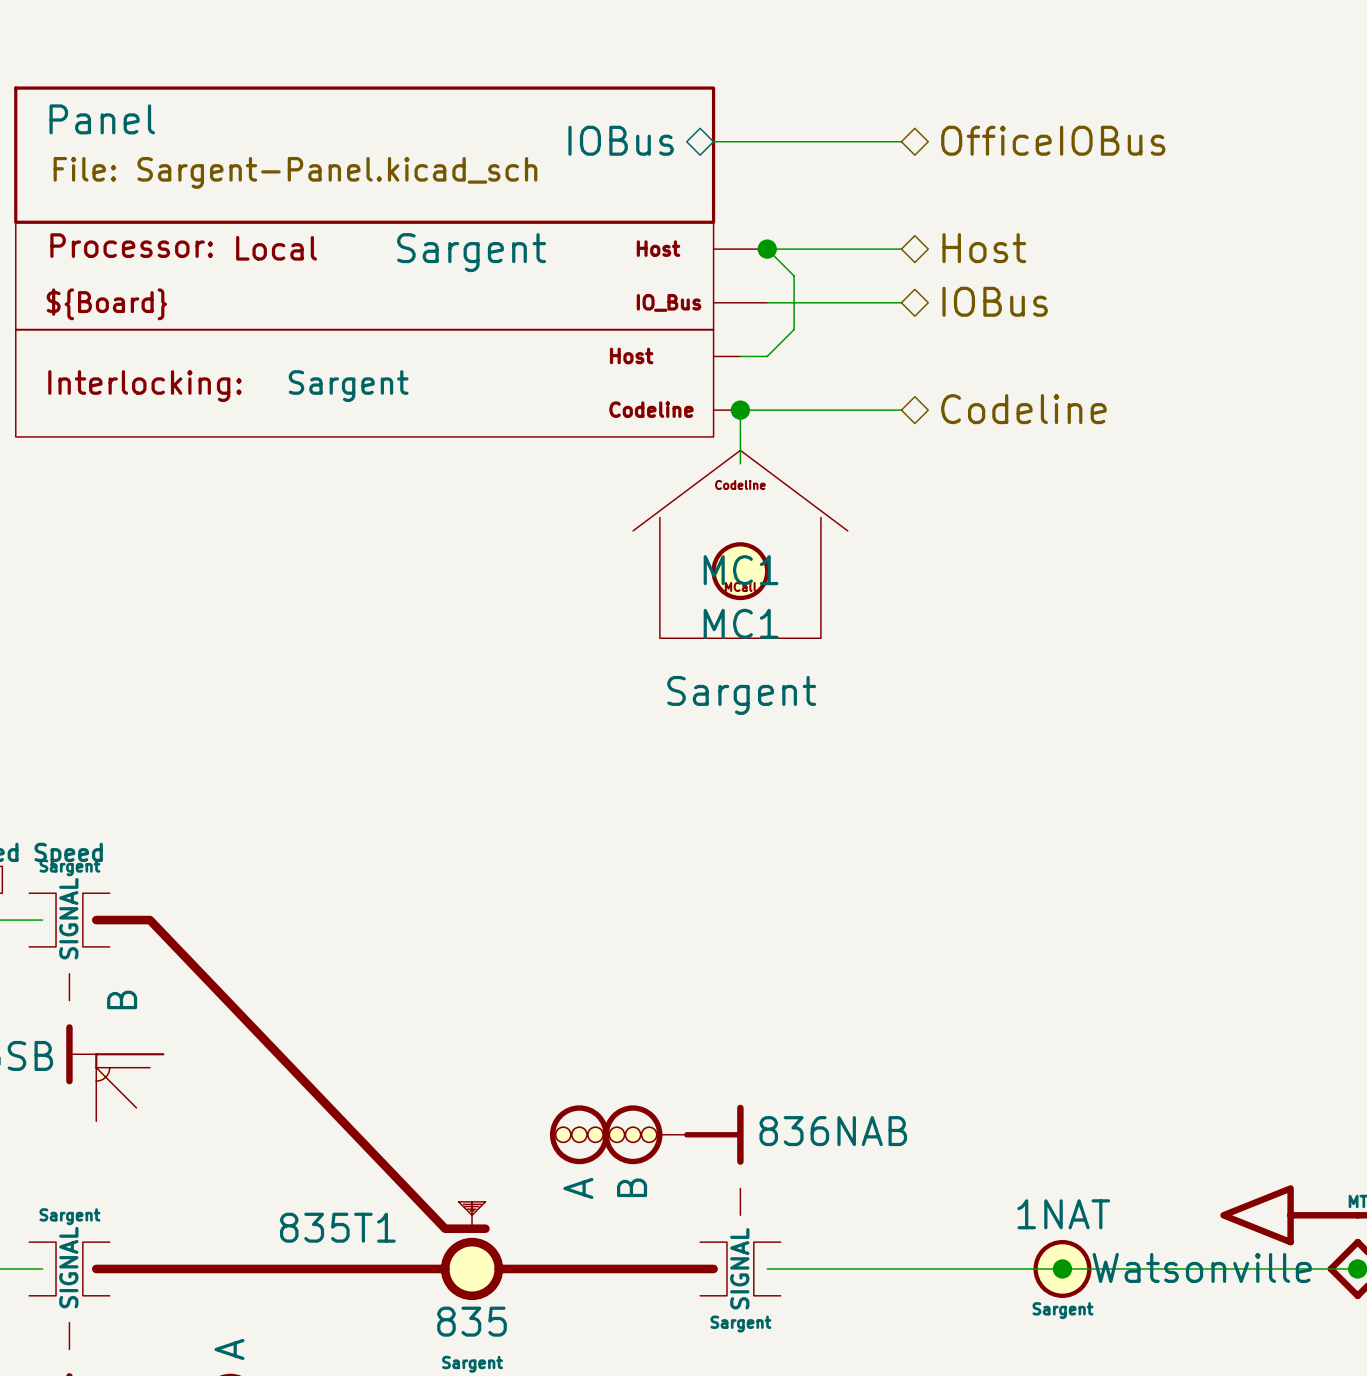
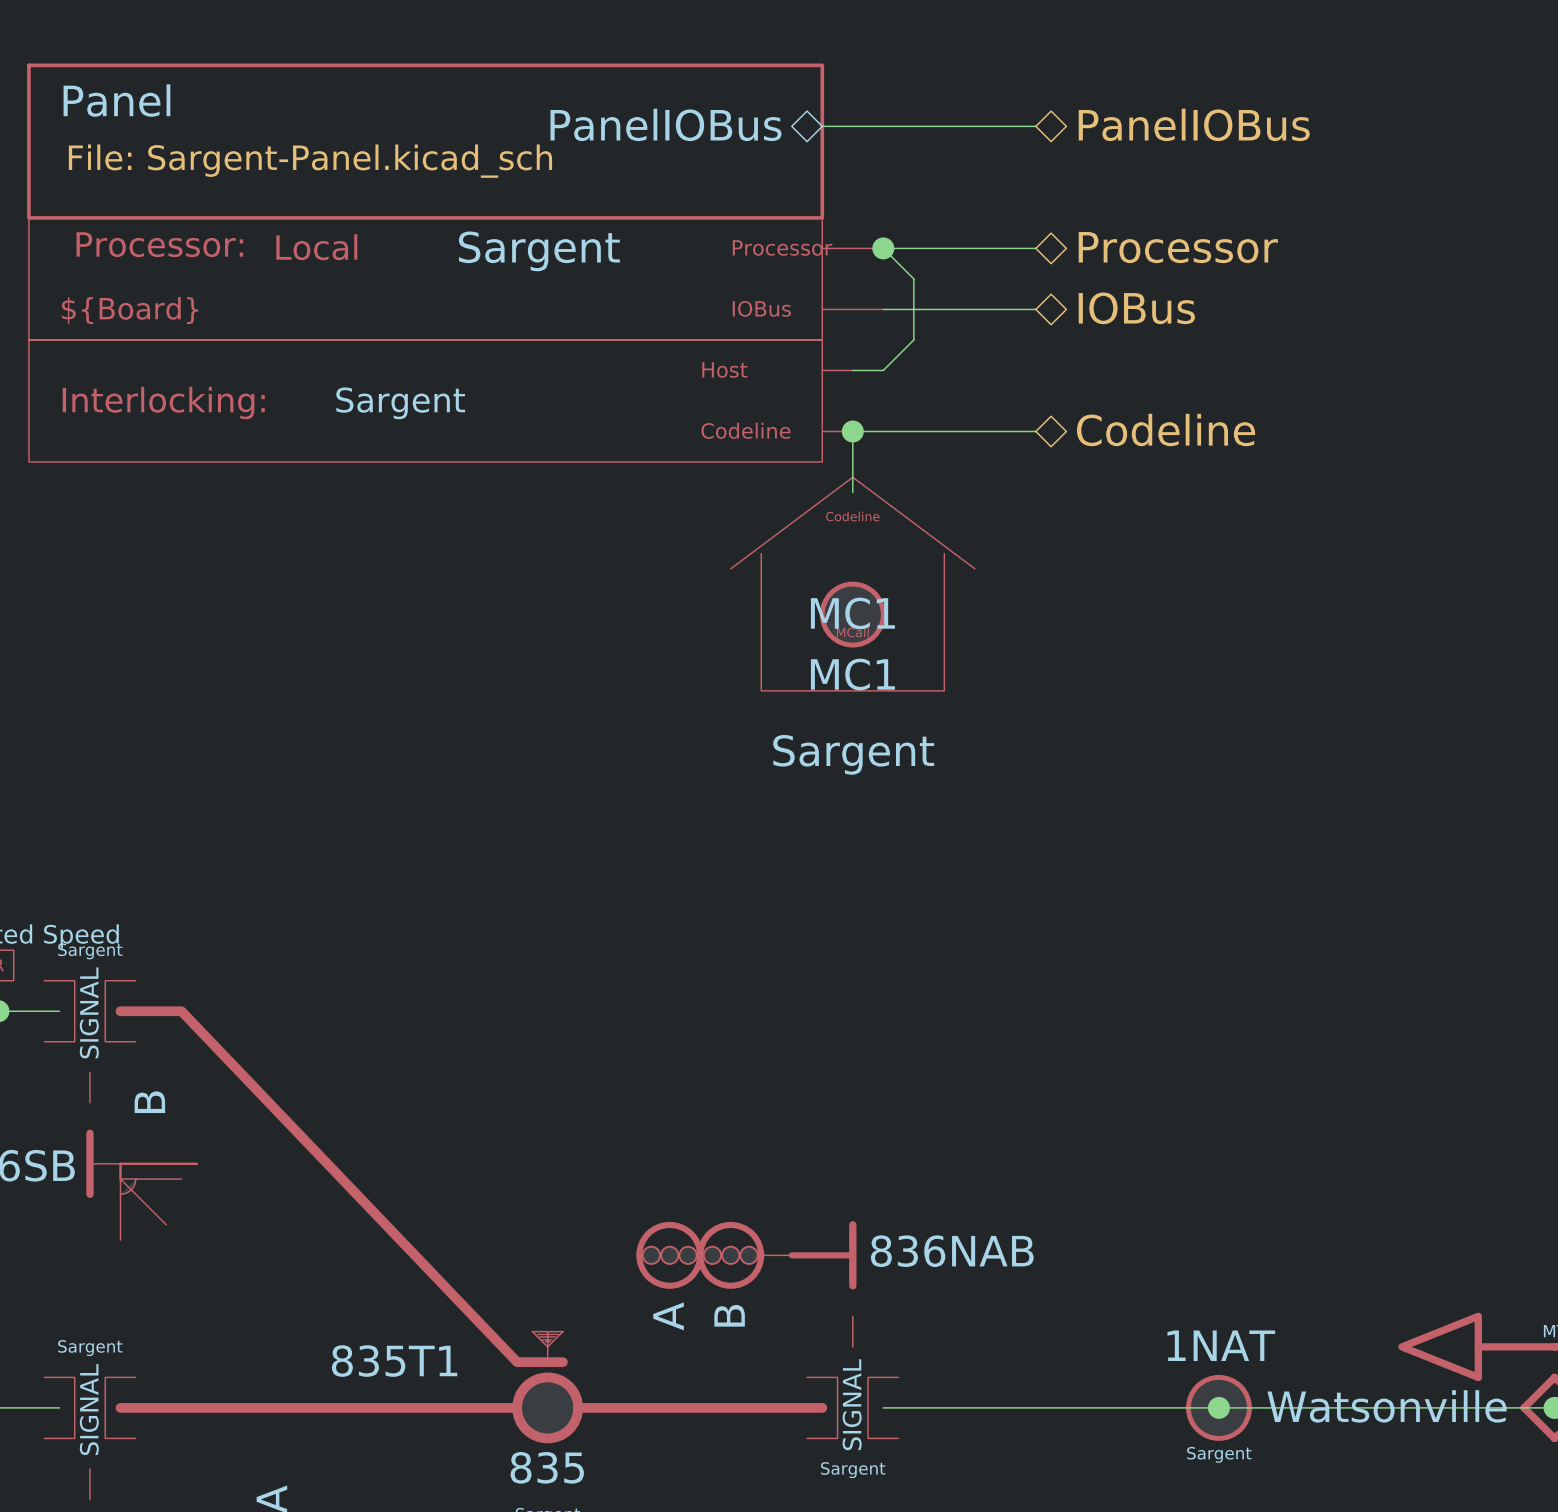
sheet pin: IOBus (621, 140) -> PanelIOBus (666, 124)
hierarchical label: OfficeIOBus (1053, 140) -> PanelIOBus (1194, 124)
part text: Host (658, 248) -> Processor (782, 247)
hierarchical label: Host (984, 248) -> Processor (1178, 247)
part text: IO_Bus (669, 302) -> IOBus (761, 308)

